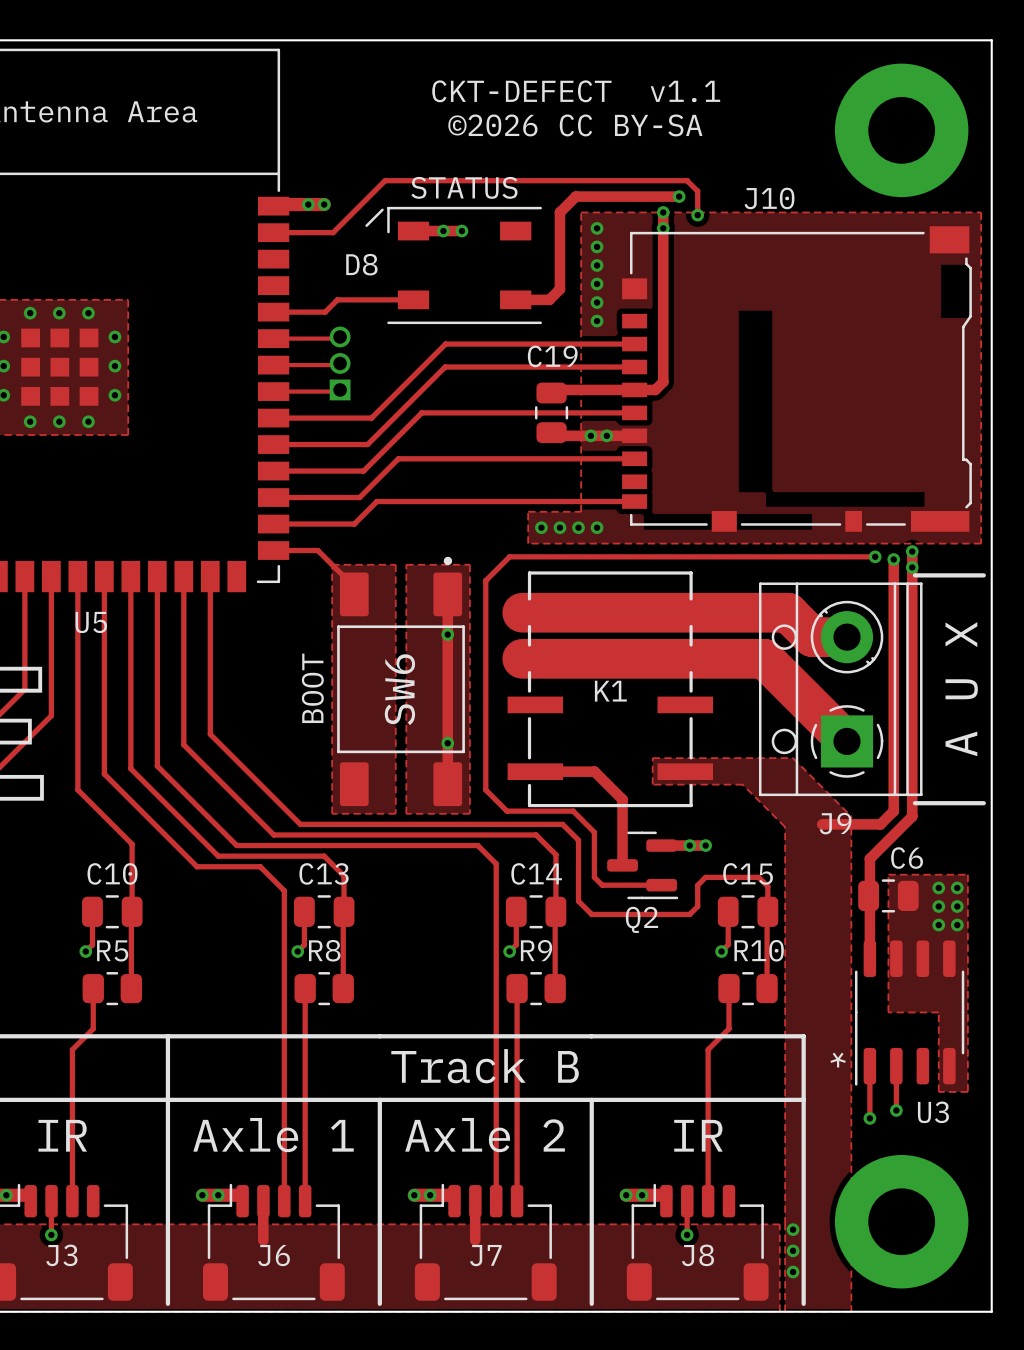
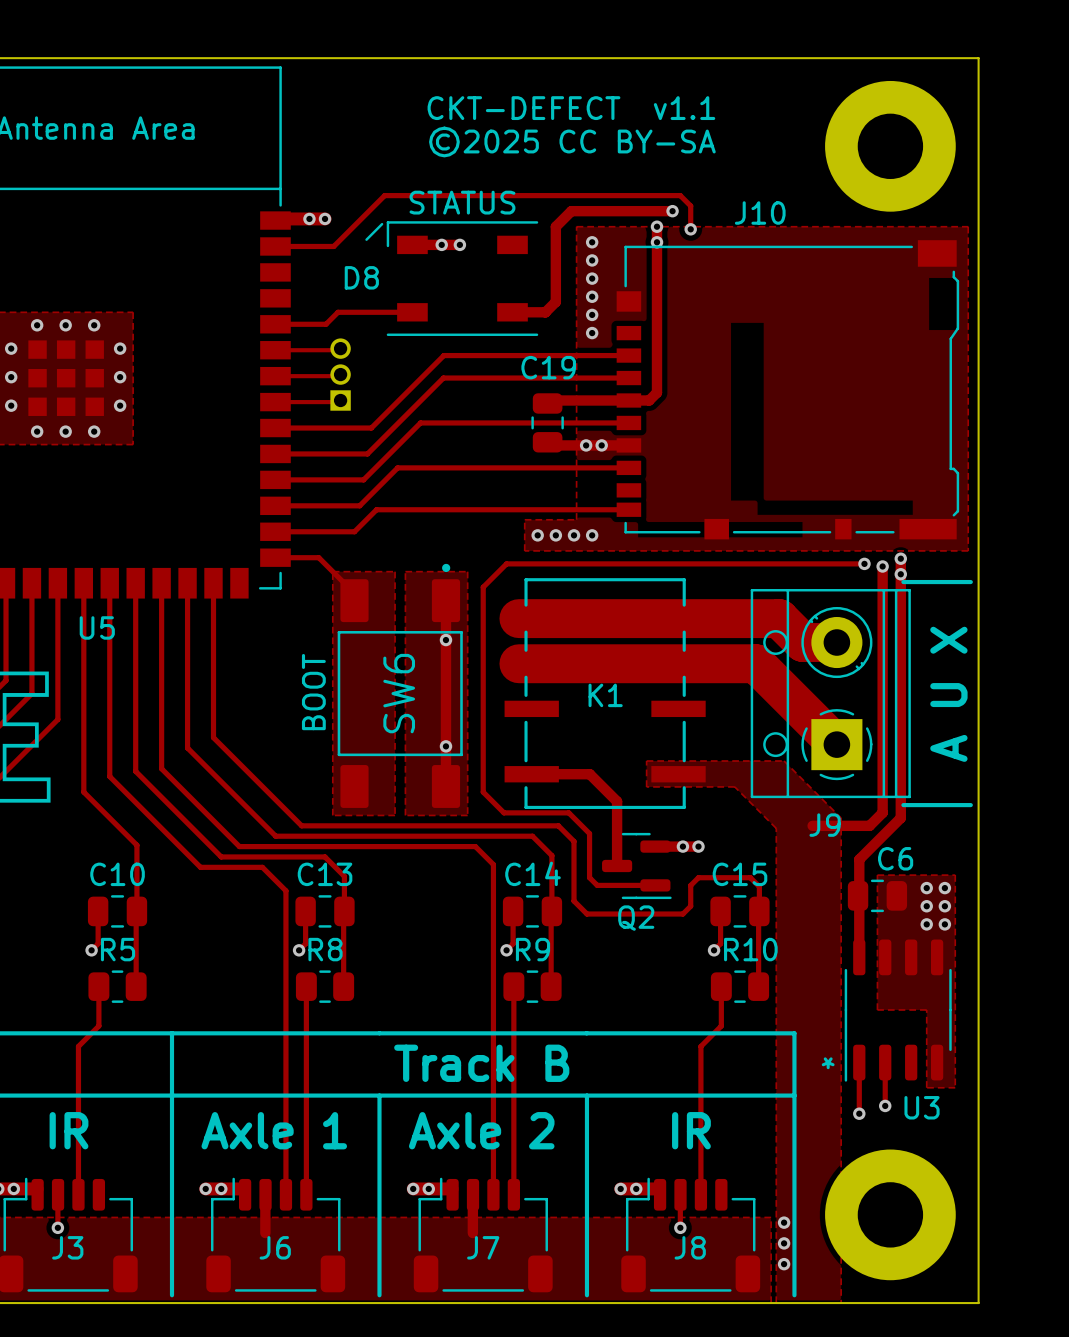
text: ©2026 CC BY-SA (575, 125) -> ©2025 CC BY-SA (572, 142)

